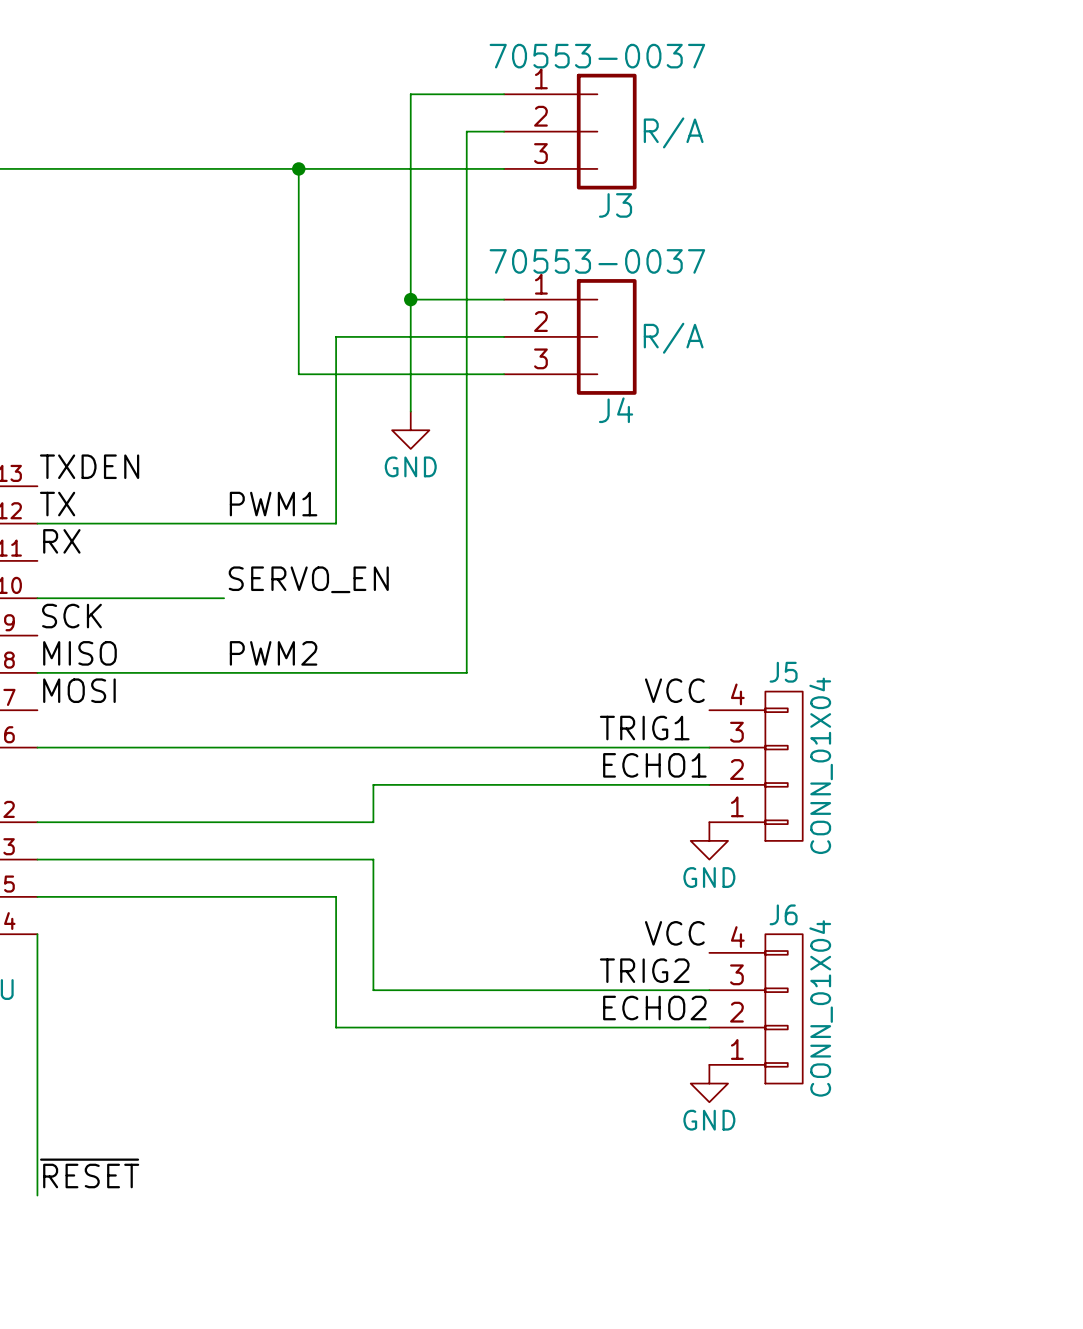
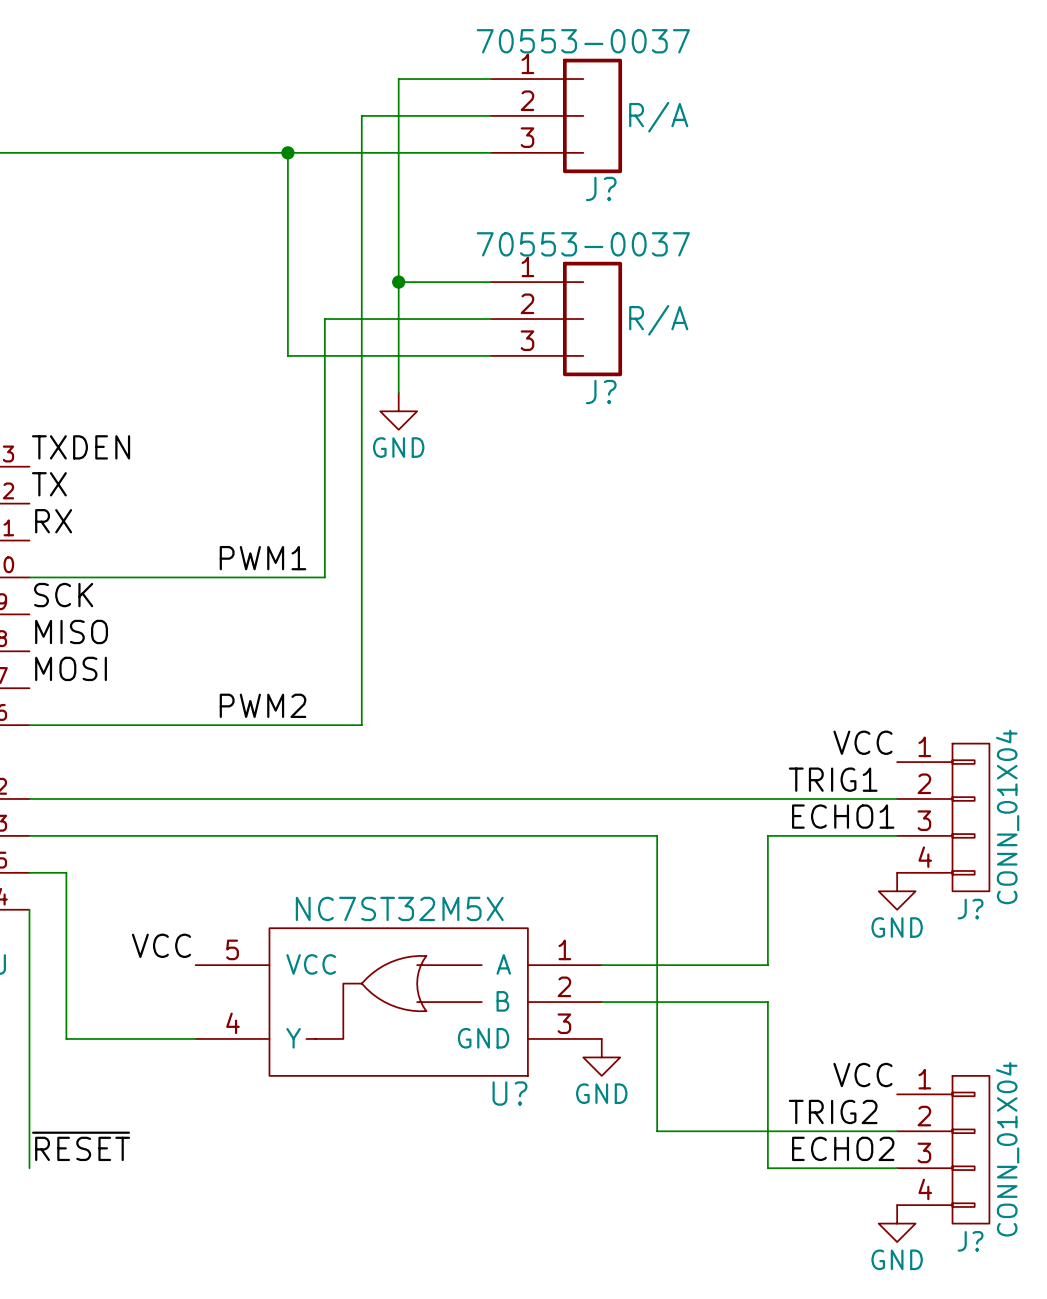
wire: (466, 131) (466, 672) (37, 672) -> (454, 115) (361, 115) (361, 725)
J3 name: J3 (615, 205) -> J? (601, 188)
J4 name: J4 (616, 410) -> J? (601, 392)
label: PWM1 (273, 504) -> none
wire: (37, 523) (336, 523) -> (214, 577) (324, 577) (324, 503)
label: SERVO_EN (308, 579) -> PWM1 (263, 558)
label position: PWM2 (273, 653) -> PWM2 (263, 705)
label: VCC (674, 690) -> none
label position: TRIG1 (644, 728) -> TRIG1 (833, 779)
wire: (373, 747) (709, 747) -> none
label position: ECHO1 (654, 765) -> ECHO1 (843, 816)
label: none -> VCC (862, 742)
J5: CONN_01X04 (756, 766) -> none
wire: (709, 784) (373, 784) (373, 822) -> (897, 798) (361, 798)
power symbol: GND (709, 840) -> none
J?: none -> CONN_01X04 (943, 817)
wire: (373, 859) (373, 990) (616, 990) -> (361, 835) (657, 835) (657, 1131) (897, 1131)
wire: none -> (897, 835) (767, 835) (767, 965) (694, 965)
wire: (74, 896) (336, 896) (336, 1027) (616, 1027) -> (66, 872) (66, 1038) (195, 1038)
power symbol: none -> GND (897, 891)
label: VCC (674, 933) -> none
label: none -> VCC (161, 945)
label position: TRIG2 (644, 970) -> TRIG2 (833, 1111)
label position: ECHO2 (654, 1008) -> ECHO2 (843, 1148)
J6: CONN_01X04 (756, 1008) -> none
U?: none -> NC7ST32M5X (398, 1002)
wire: none -> (694, 1002) (767, 1002) (767, 1168) (897, 1168)
power symbol position: GND (709, 1083) -> GND (601, 1057)
label: none -> VCC (862, 1075)
J?: none -> CONN_01X04 (943, 1149)
power symbol: none -> GND (897, 1223)

